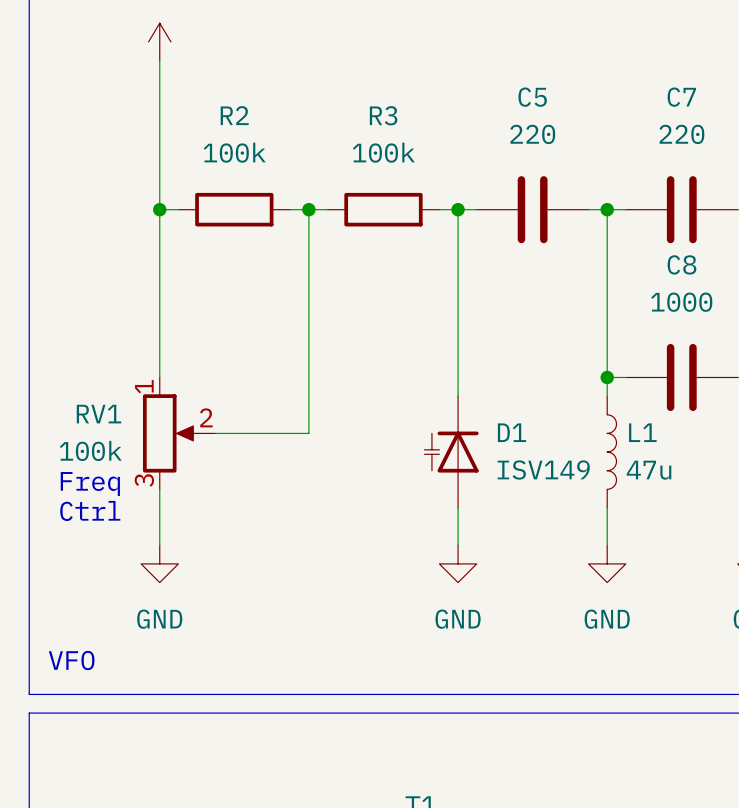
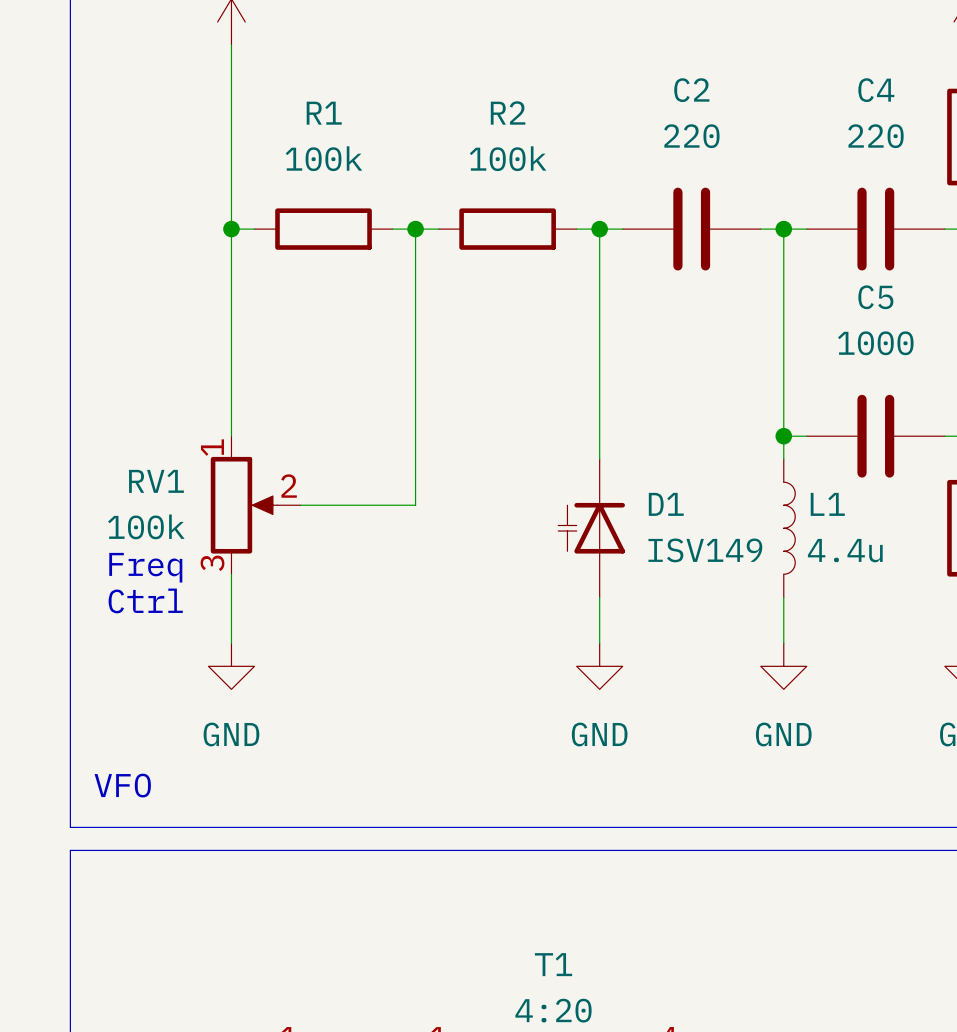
C5 name: C5 (532, 97) -> C2 (691, 90)
C7 name: C7 (681, 97) -> C4 (876, 90)
R2 name: R2 (234, 115) -> R1 (324, 113)
R3 name: R3 (383, 115) -> R2 (508, 112)
C8 name: C8 (681, 264) -> C5 (875, 297)
L1 value: 47u (649, 470) -> 4.4u (845, 550)

